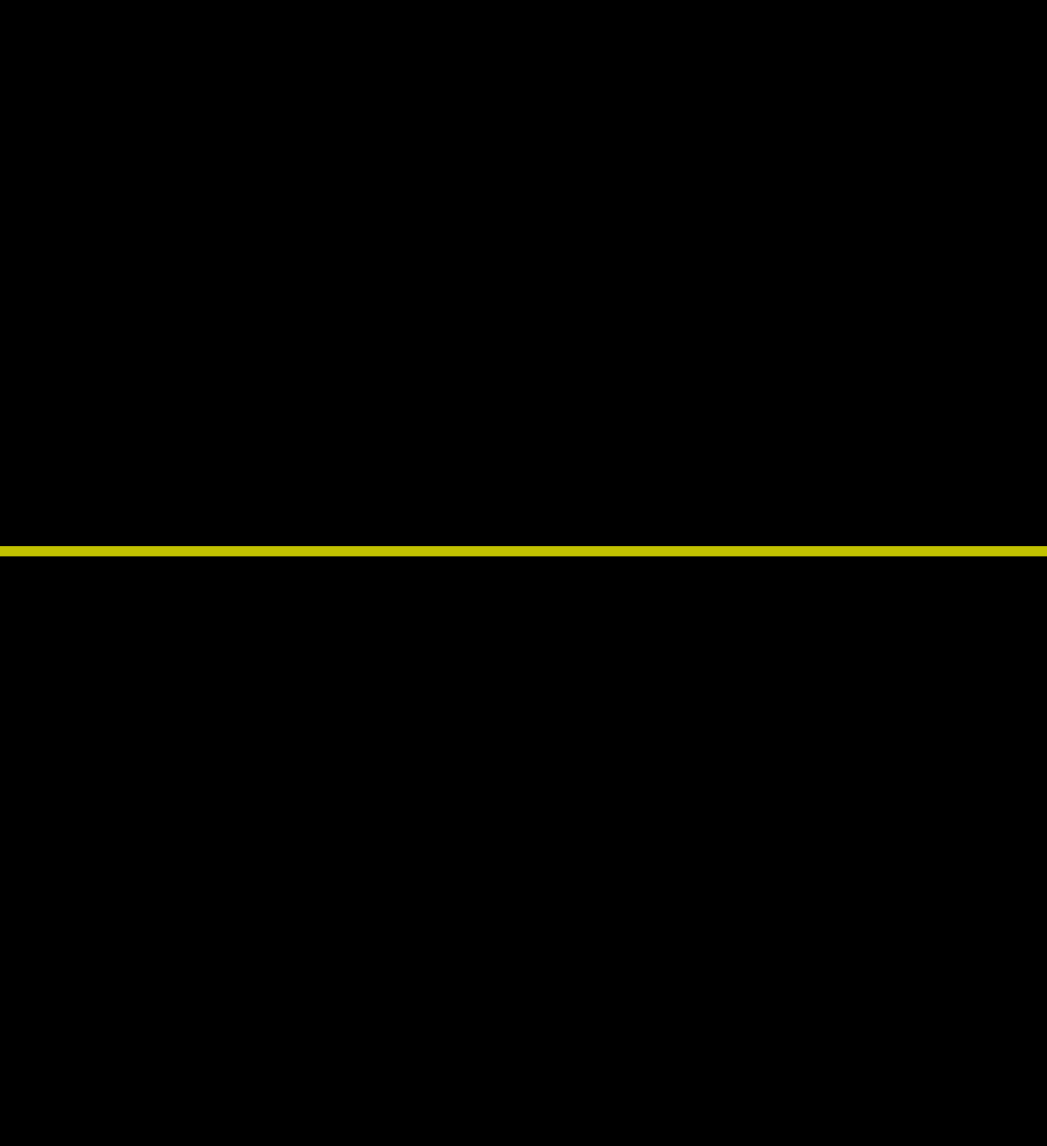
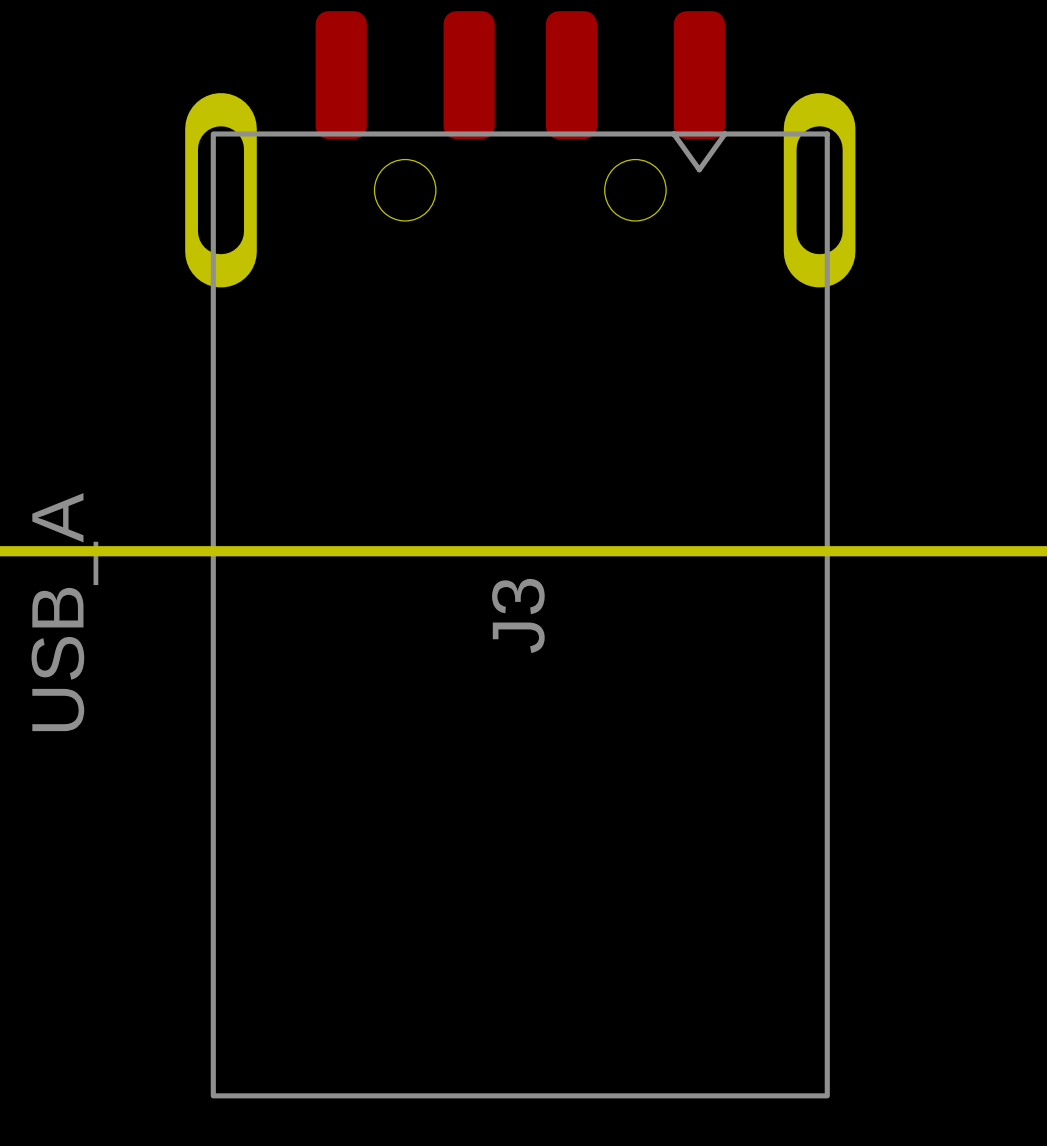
J3: none -> USB_A (520, 554)

